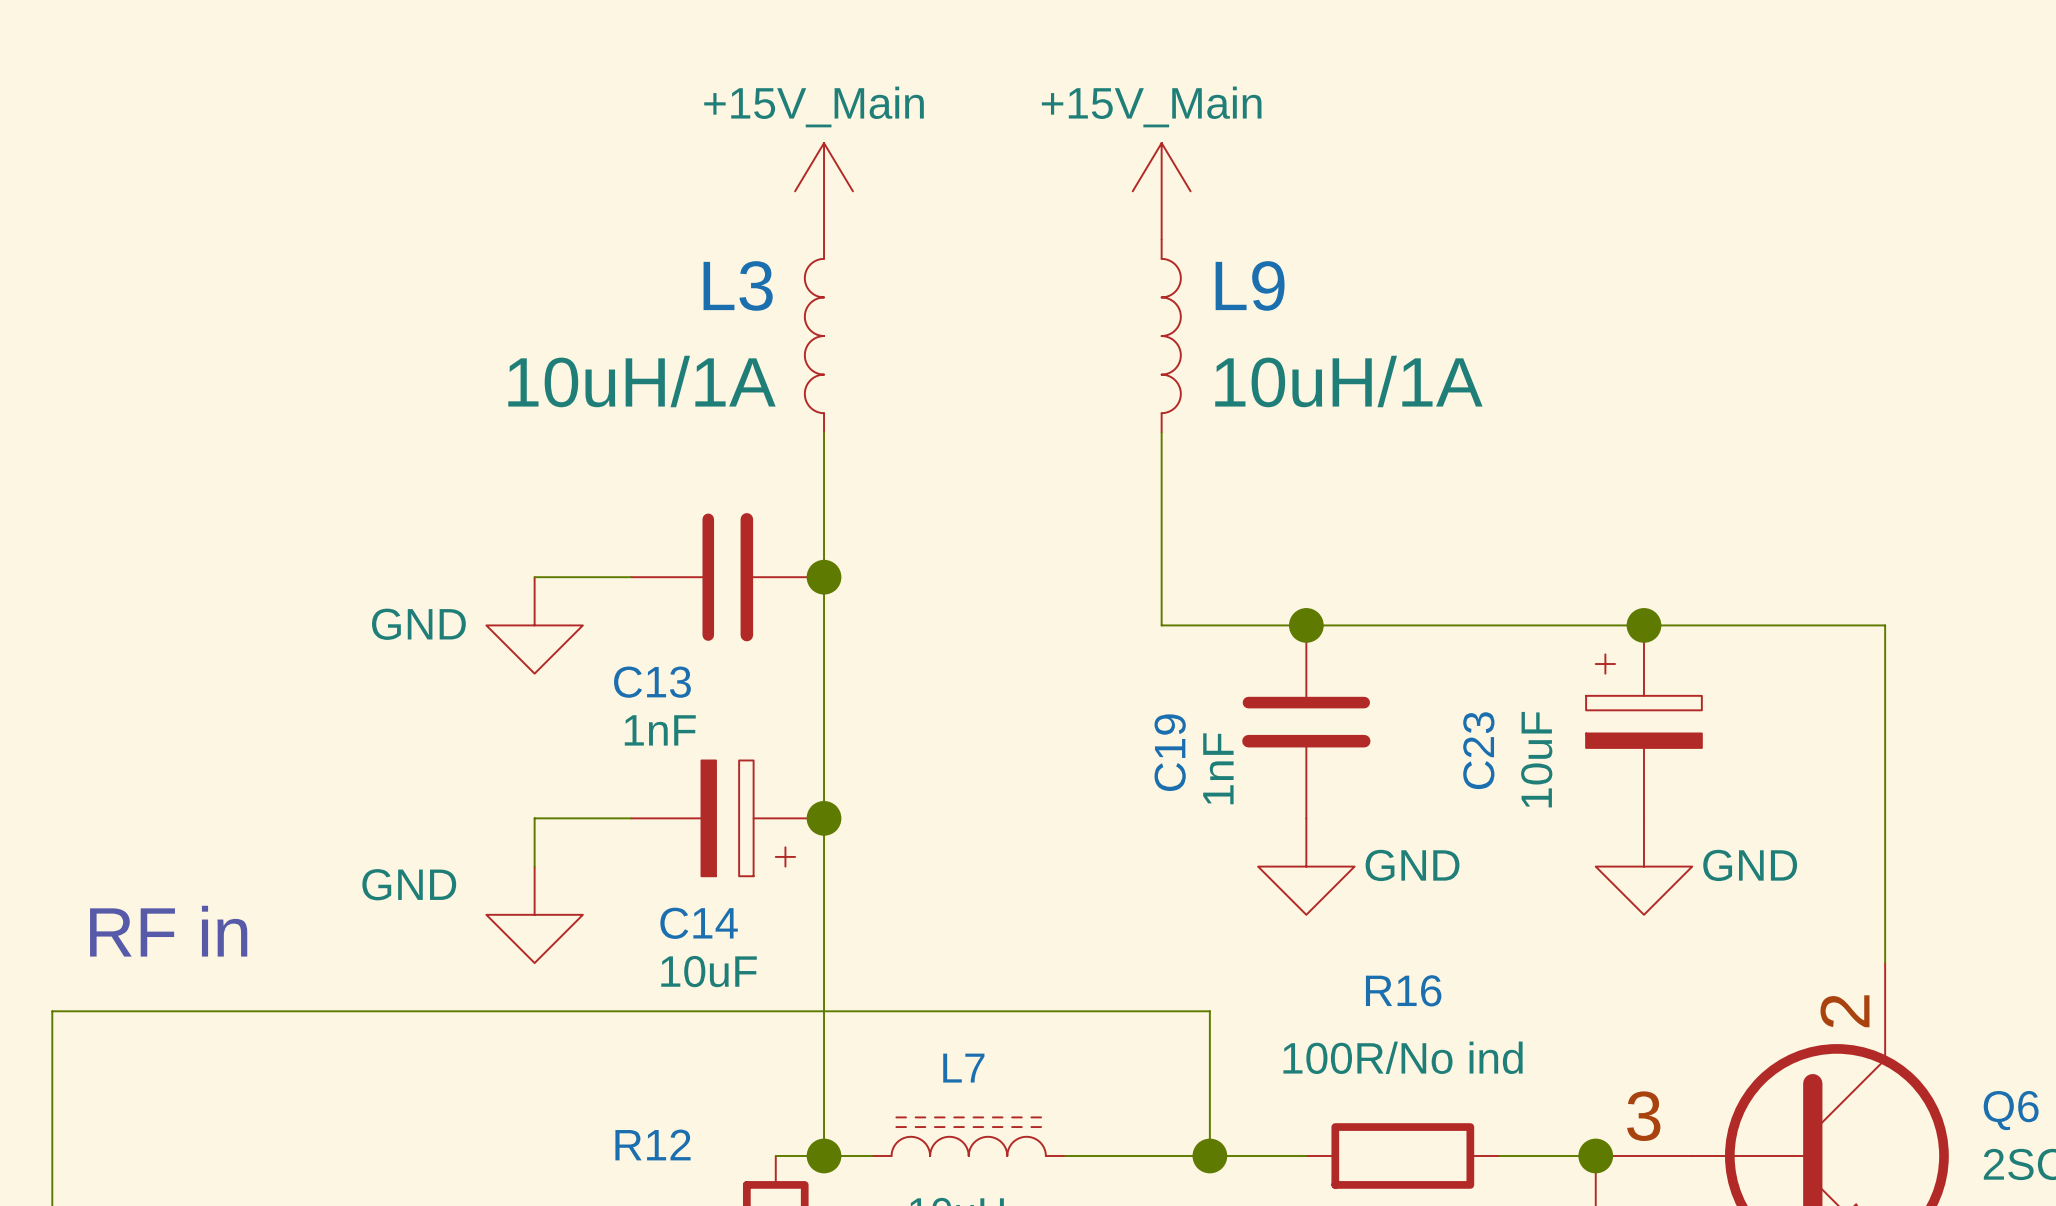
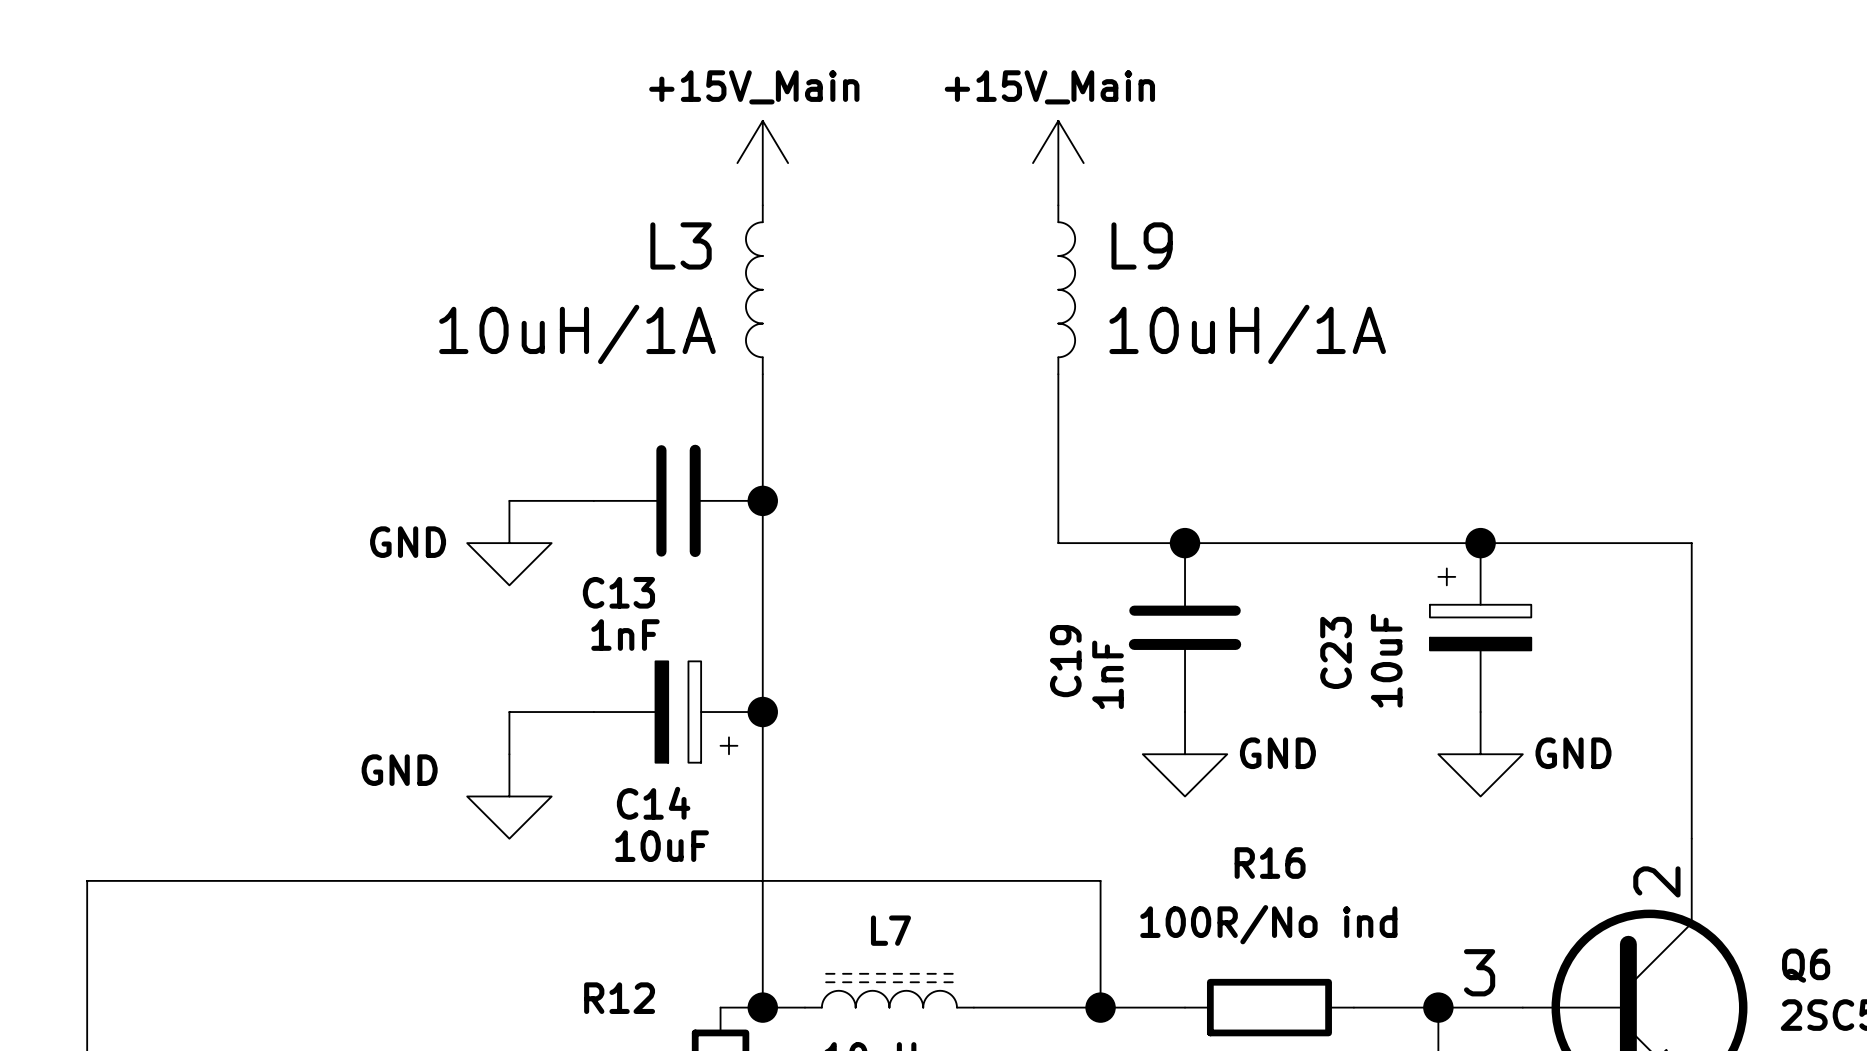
text: RF in (168, 931) -> none

